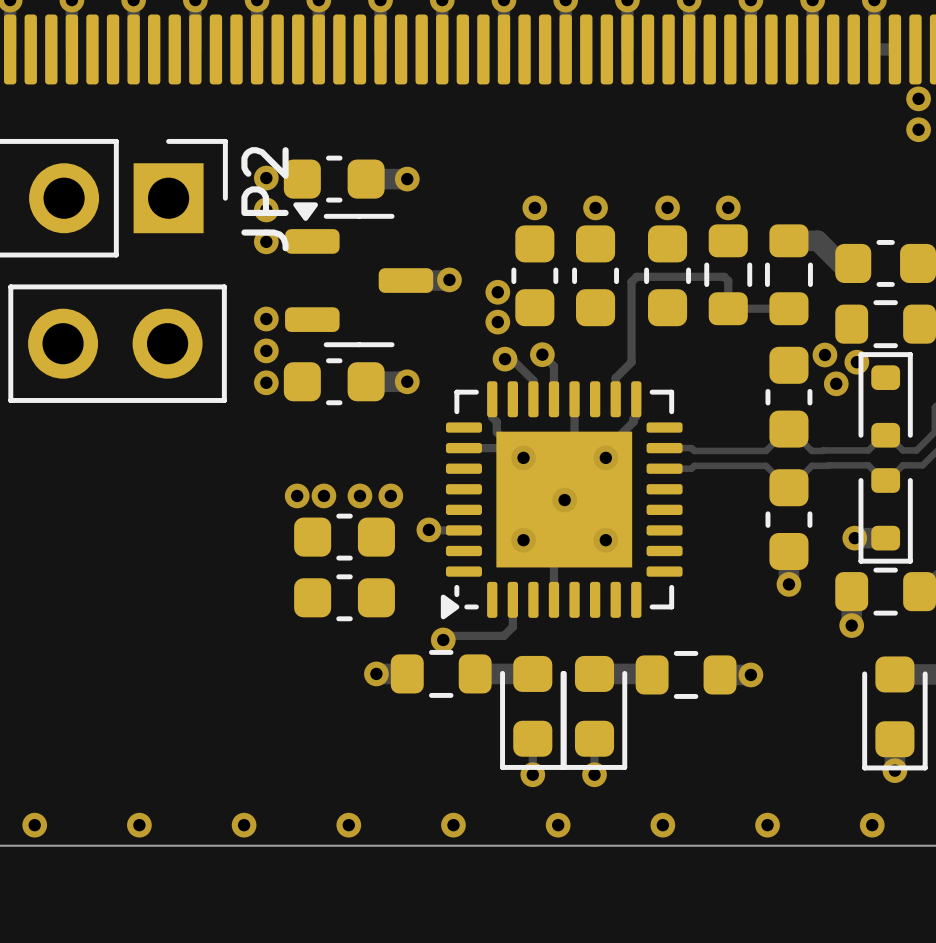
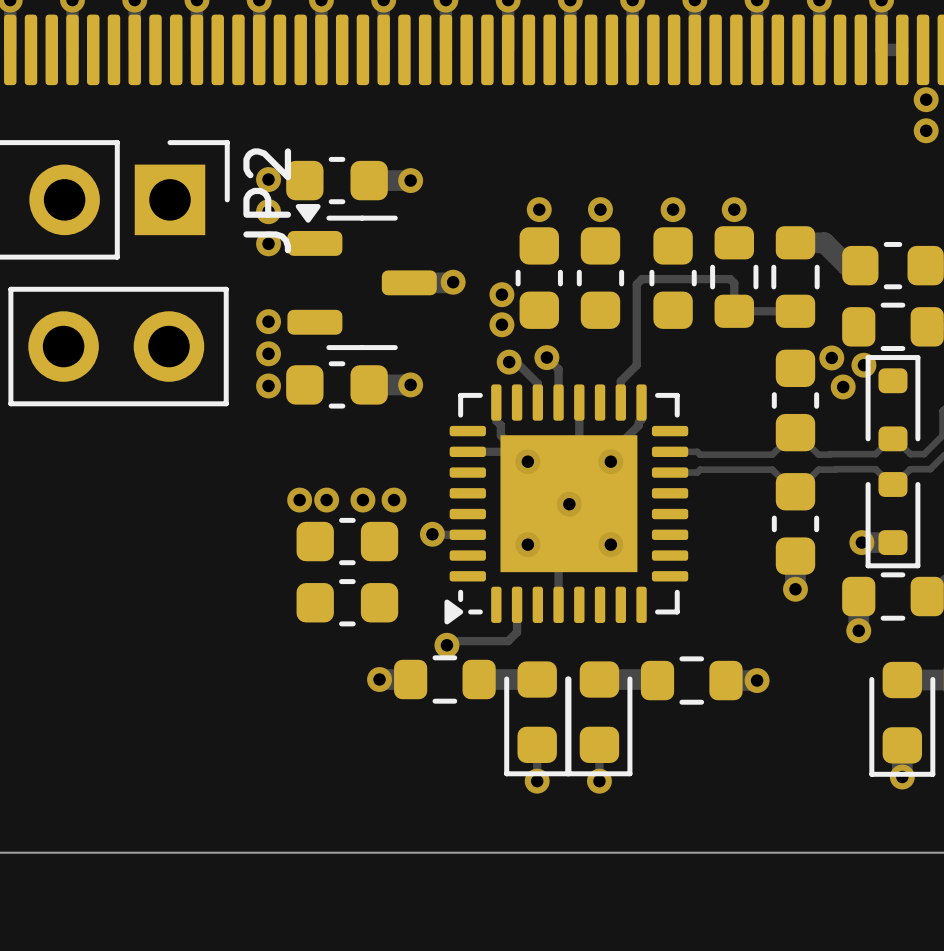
via: (34, 825) -> none
via: (139, 825) -> none
via: (244, 825) -> none
via: (348, 825) -> none
via: (453, 825) -> none
via: (558, 825) -> none
via: (662, 825) -> none
via: (767, 825) -> none
via: (872, 825) -> none

